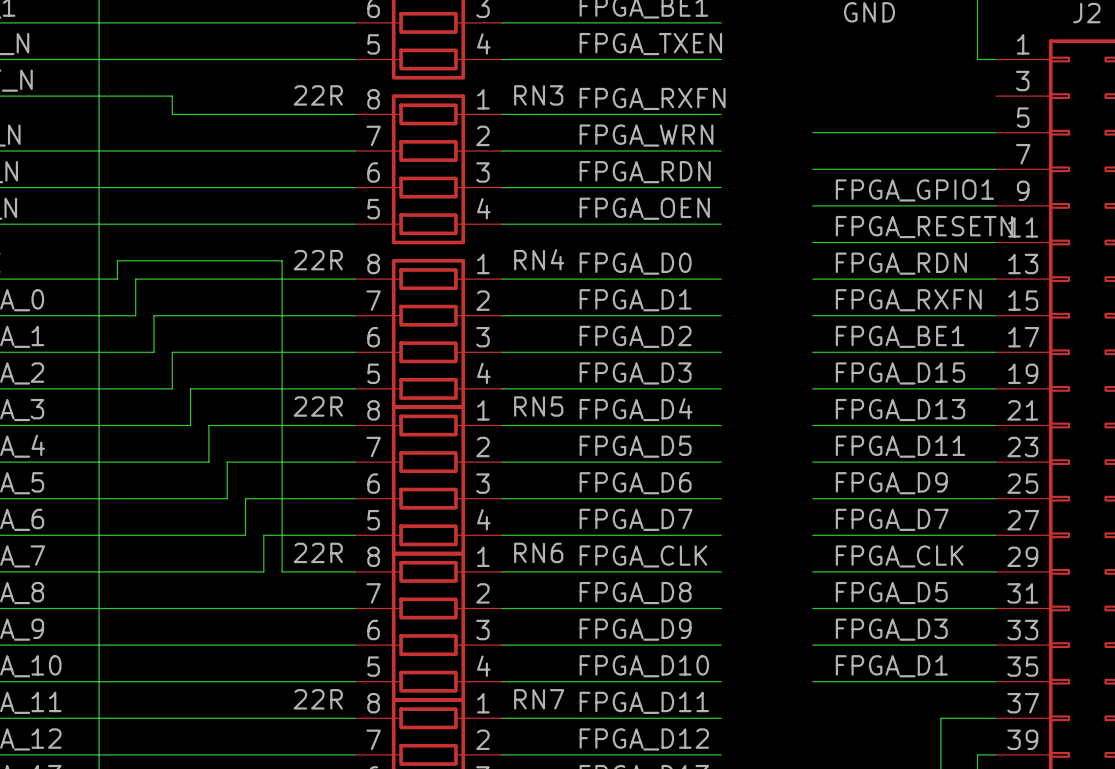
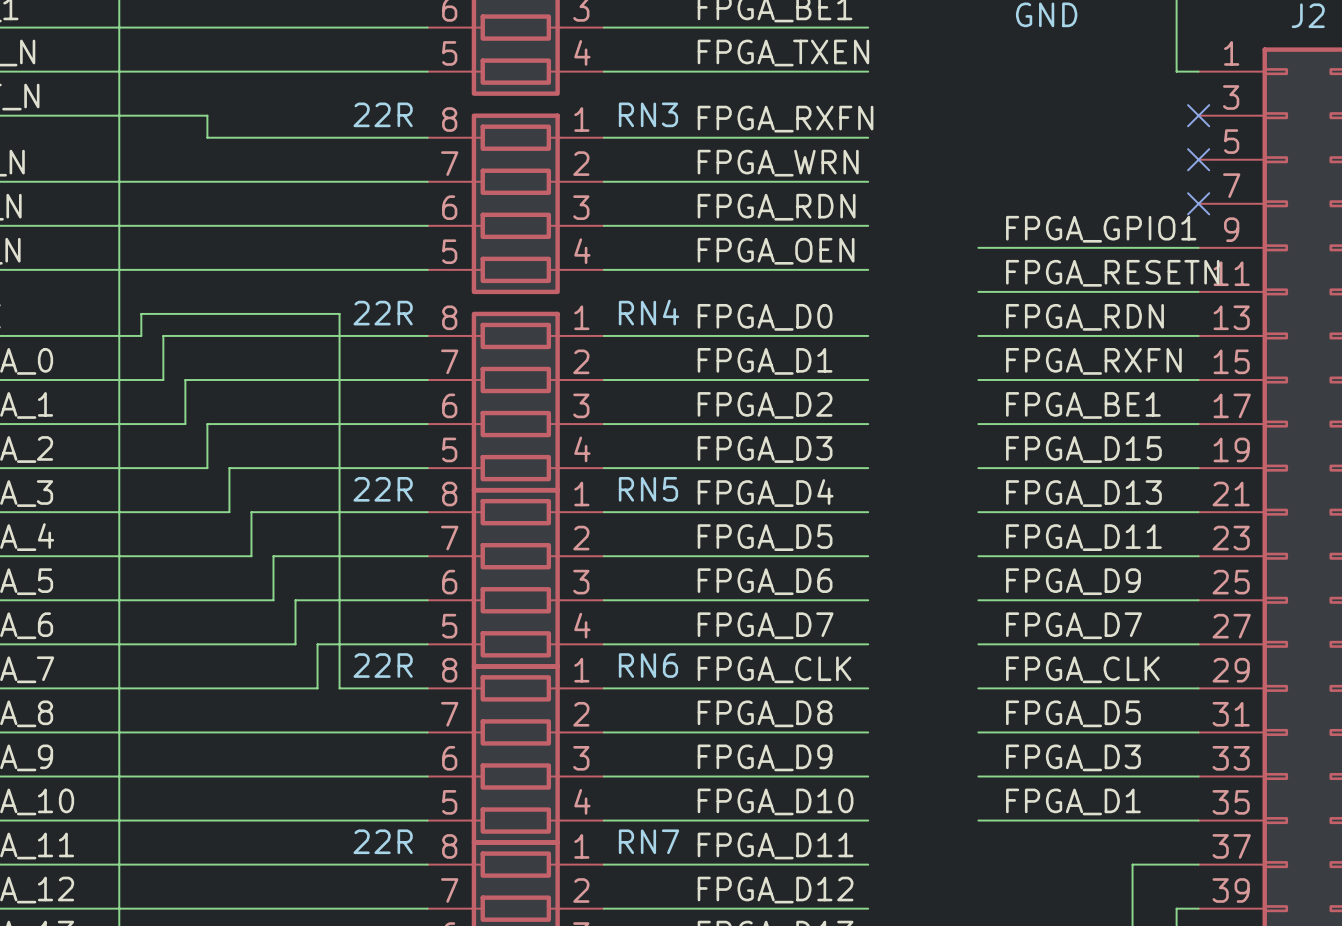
no-connect mark: none -> (1198, 115)
wire: (812, 132) (995, 132) -> none
no-connect mark: none -> (1198, 159)
wire: (812, 169) (995, 169) -> none
no-connect mark: none -> (1198, 203)

